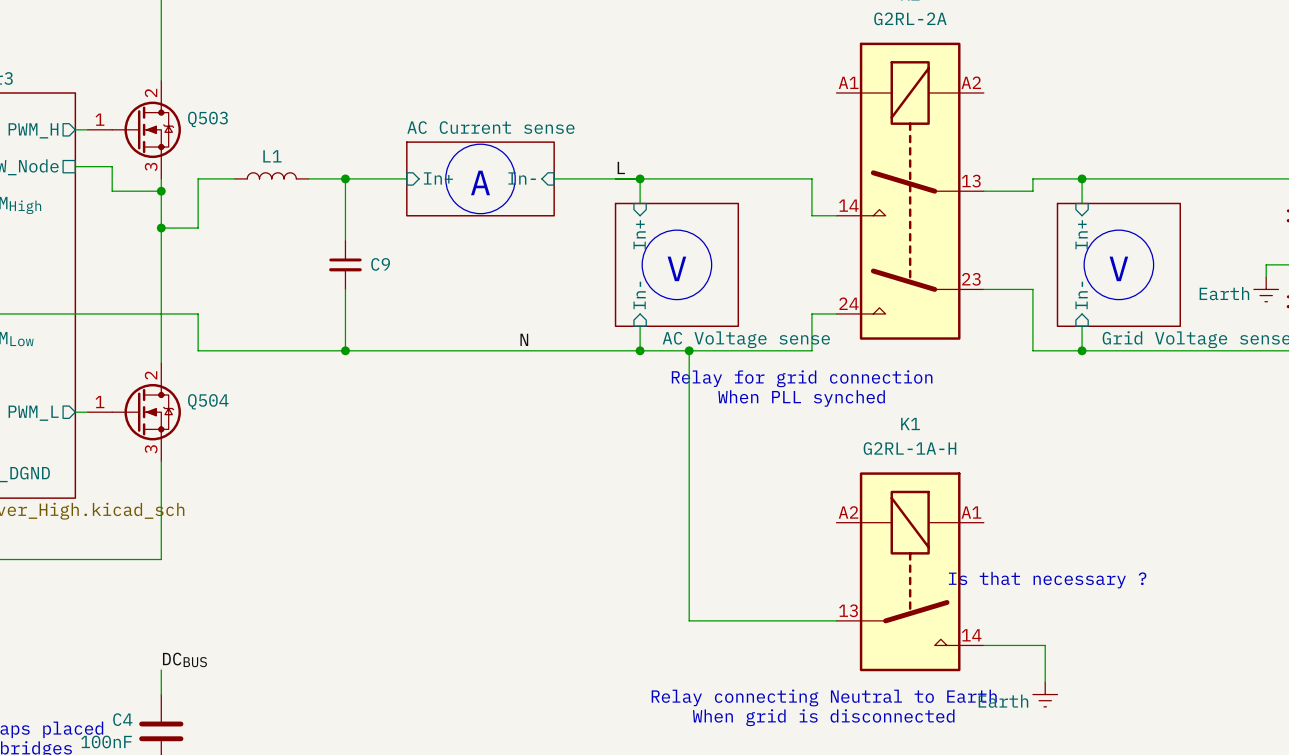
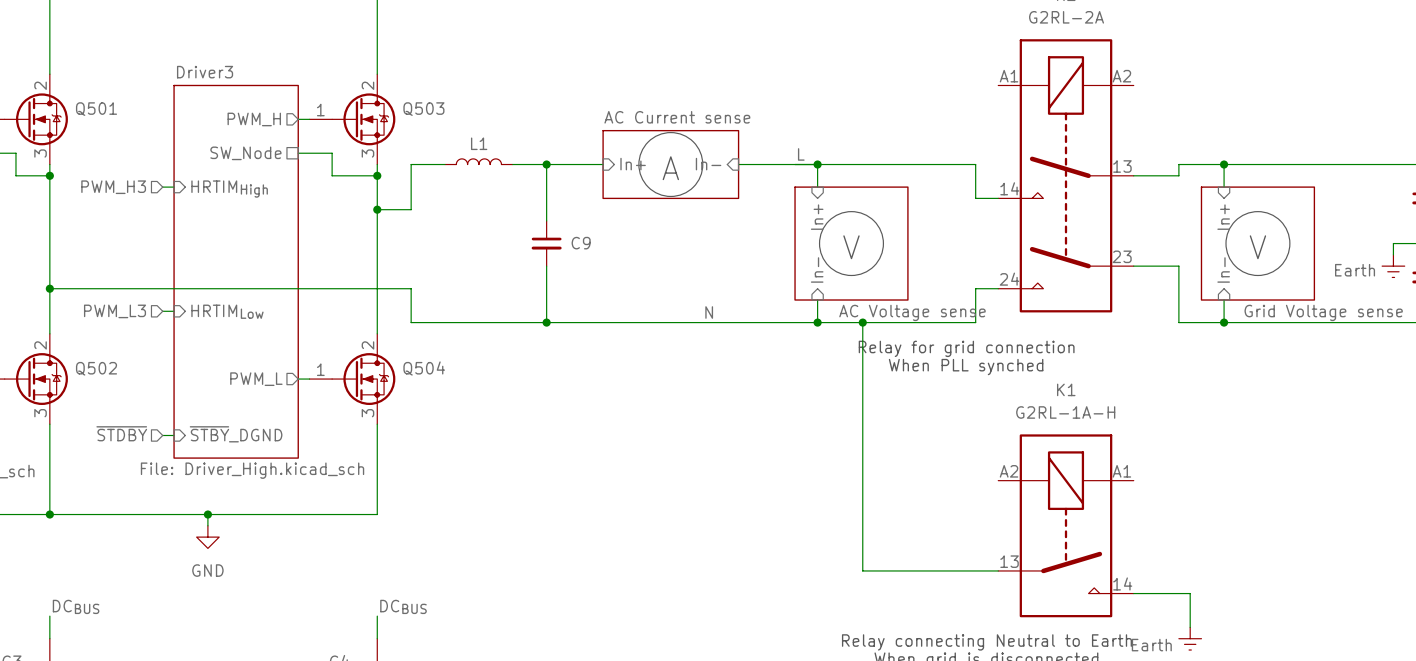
text: Is that necessary ? (1047, 580) -> none

